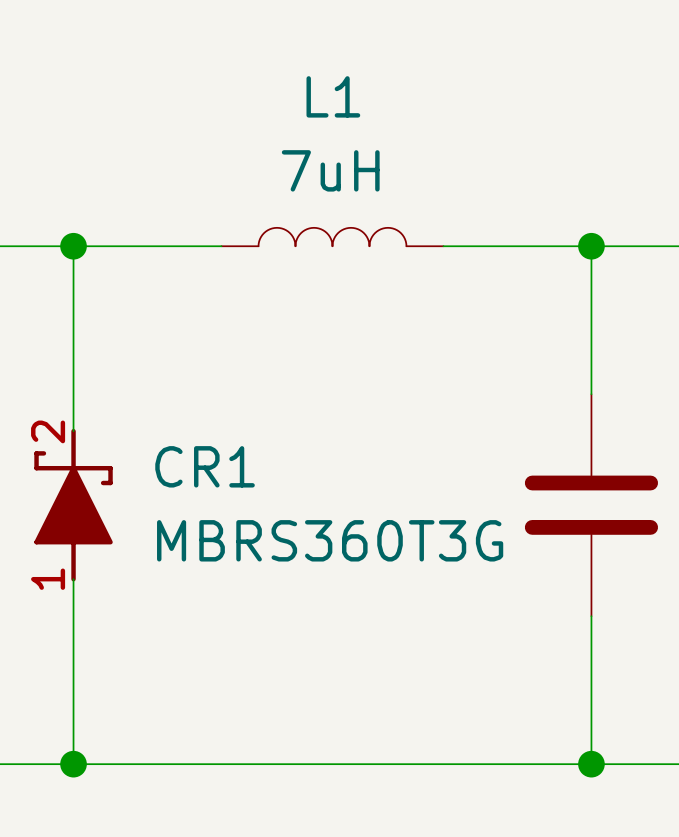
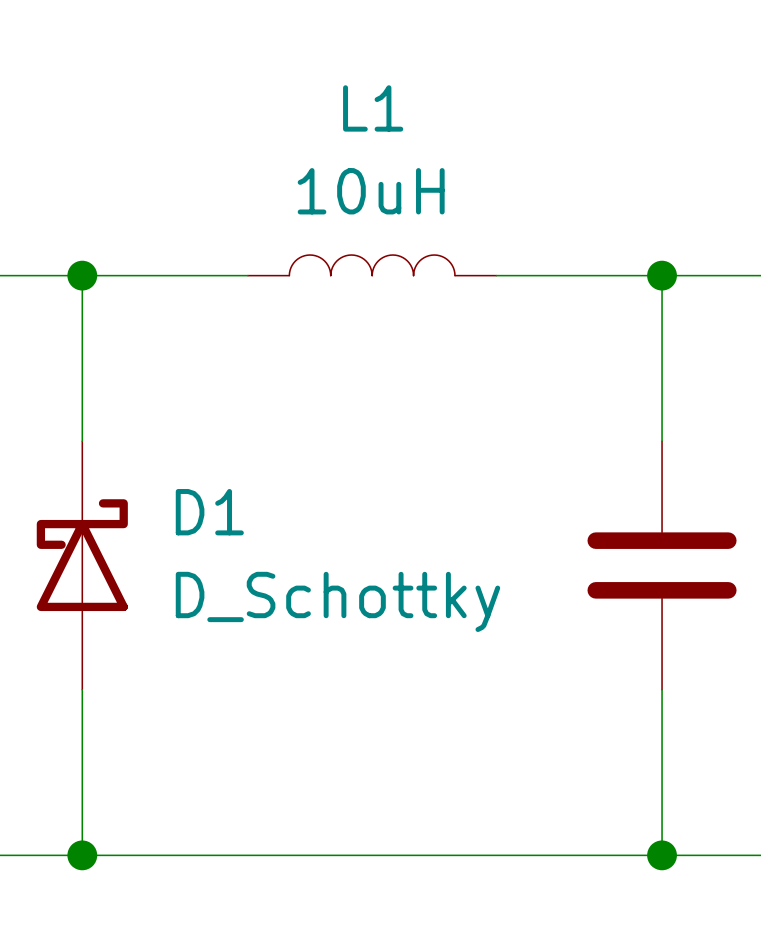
L1 value: 7uH (330, 170) -> 10uH (371, 191)
CR1: MBRS360T3G (73, 505) -> none
D1: none -> D_Schottky (82, 565)

